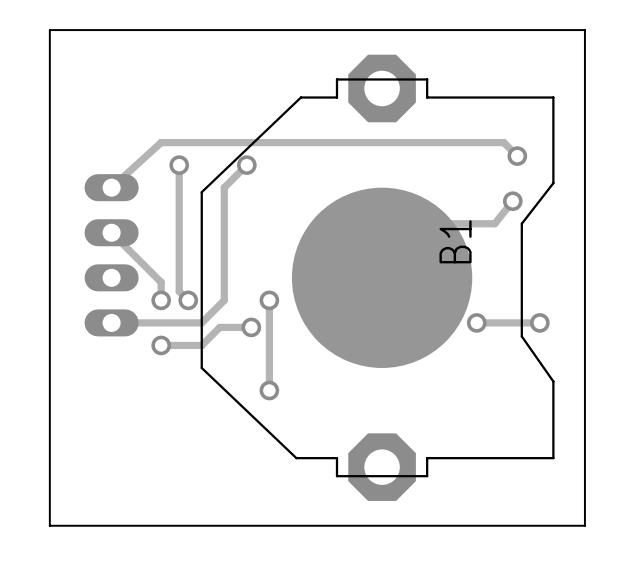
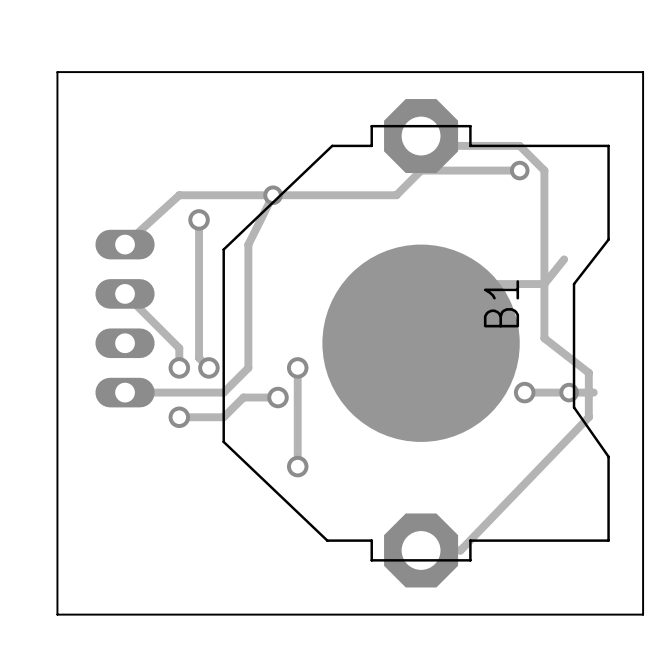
track: none -> (421, 136) (445, 145) (519, 145) (544, 170) (544, 338) (588, 372) (588, 417) (460, 550) (421, 550)
via: none -> (519, 170)
via: none -> (273, 195)
track: (359, 142) (503, 142) (517, 156) -> (396, 195) (421, 170) (519, 170)
via: (517, 156) -> none
track: (246, 165) (224, 187) -> (273, 195) (248, 244)
via: (246, 165) -> none
via: (512, 201) -> none
via: none -> (569, 392)
via: (539, 322) -> none

